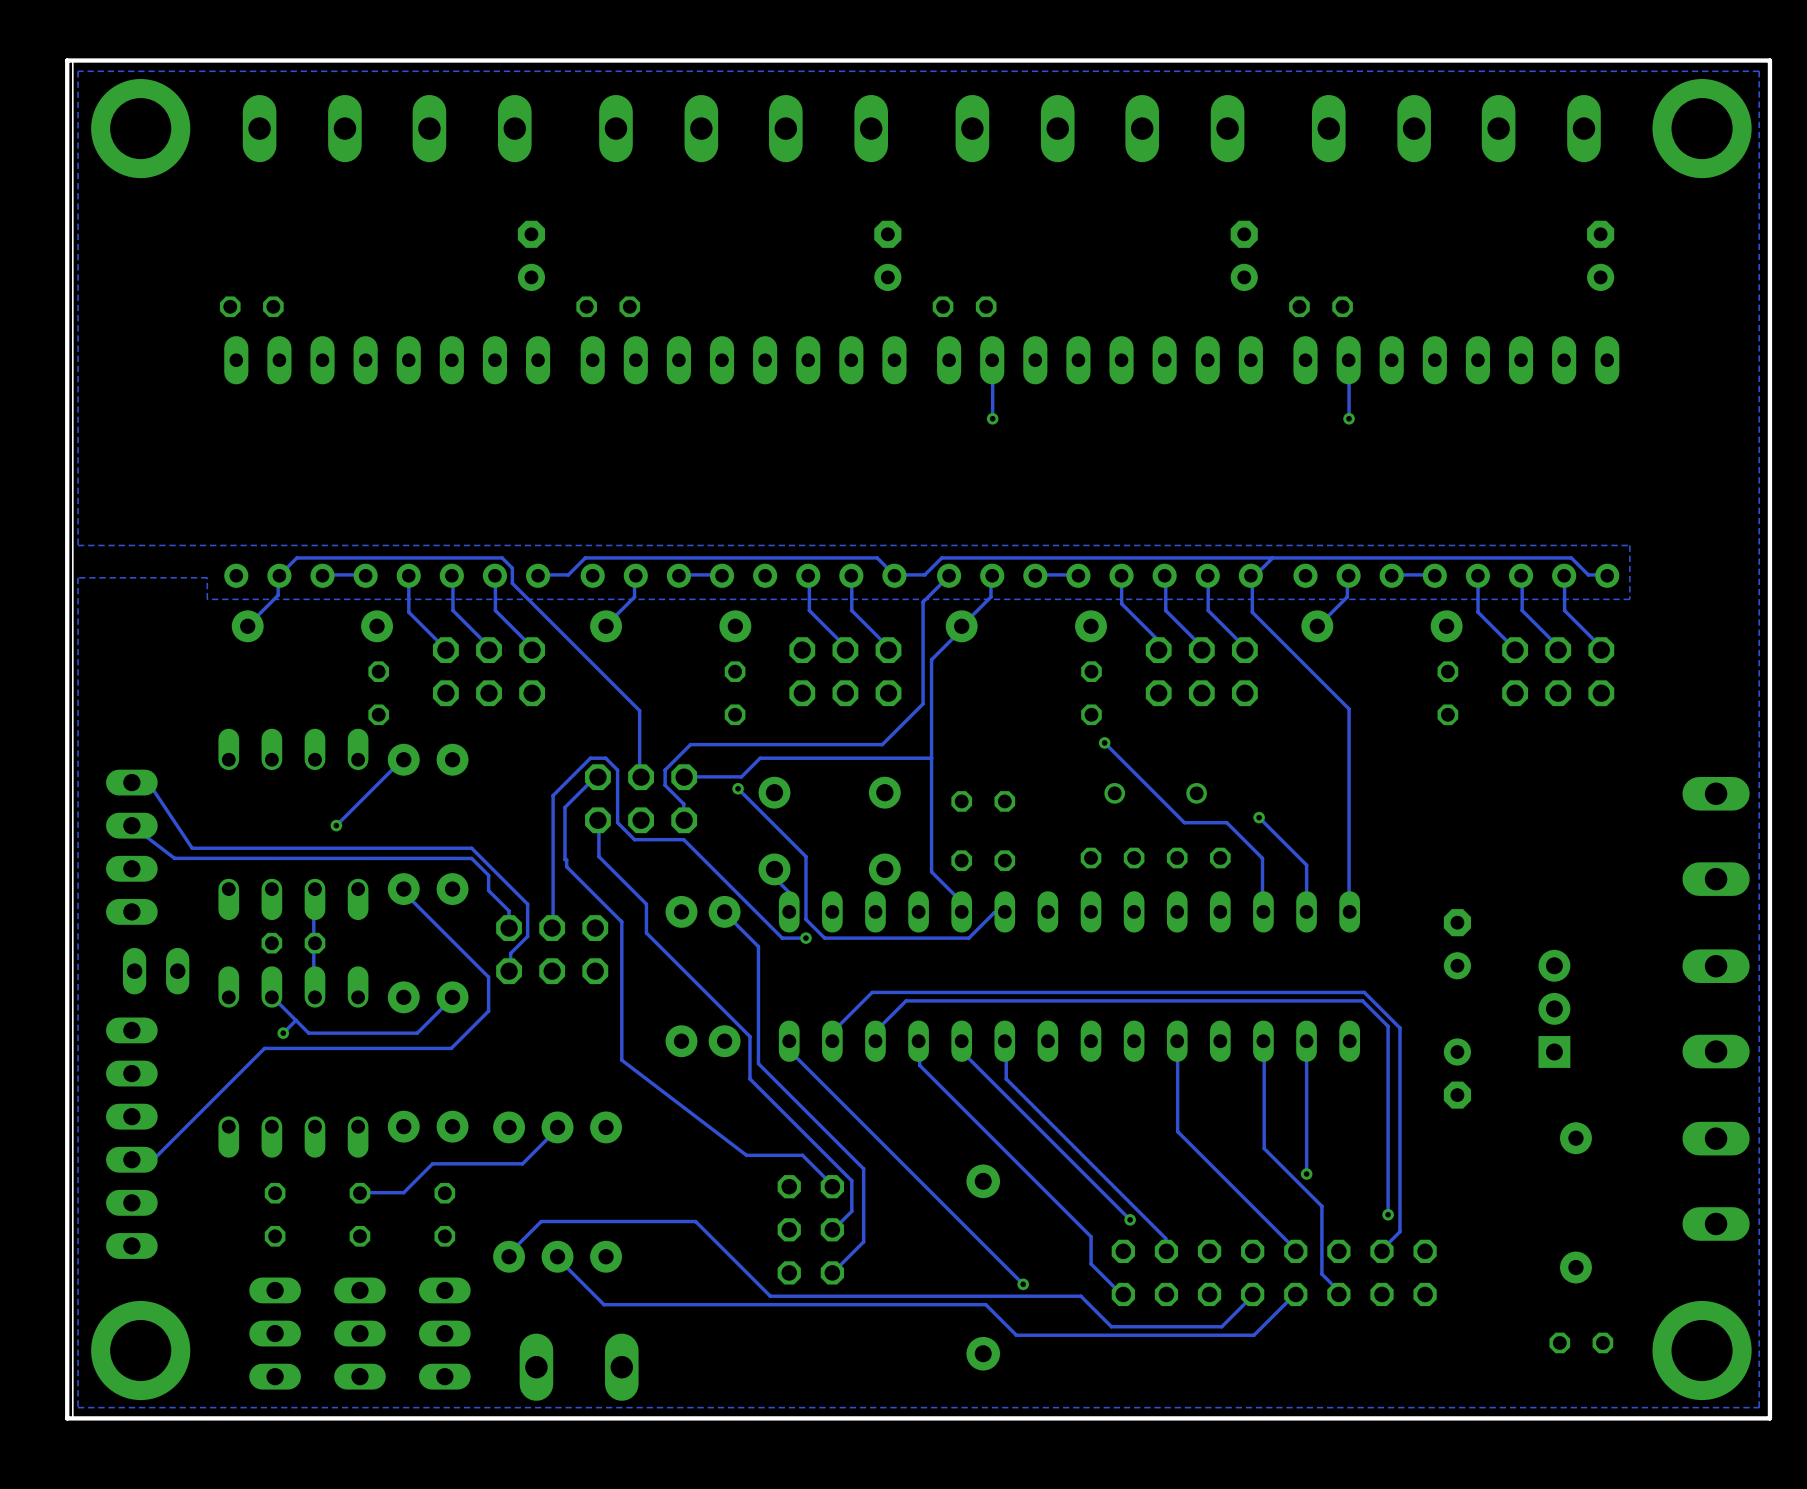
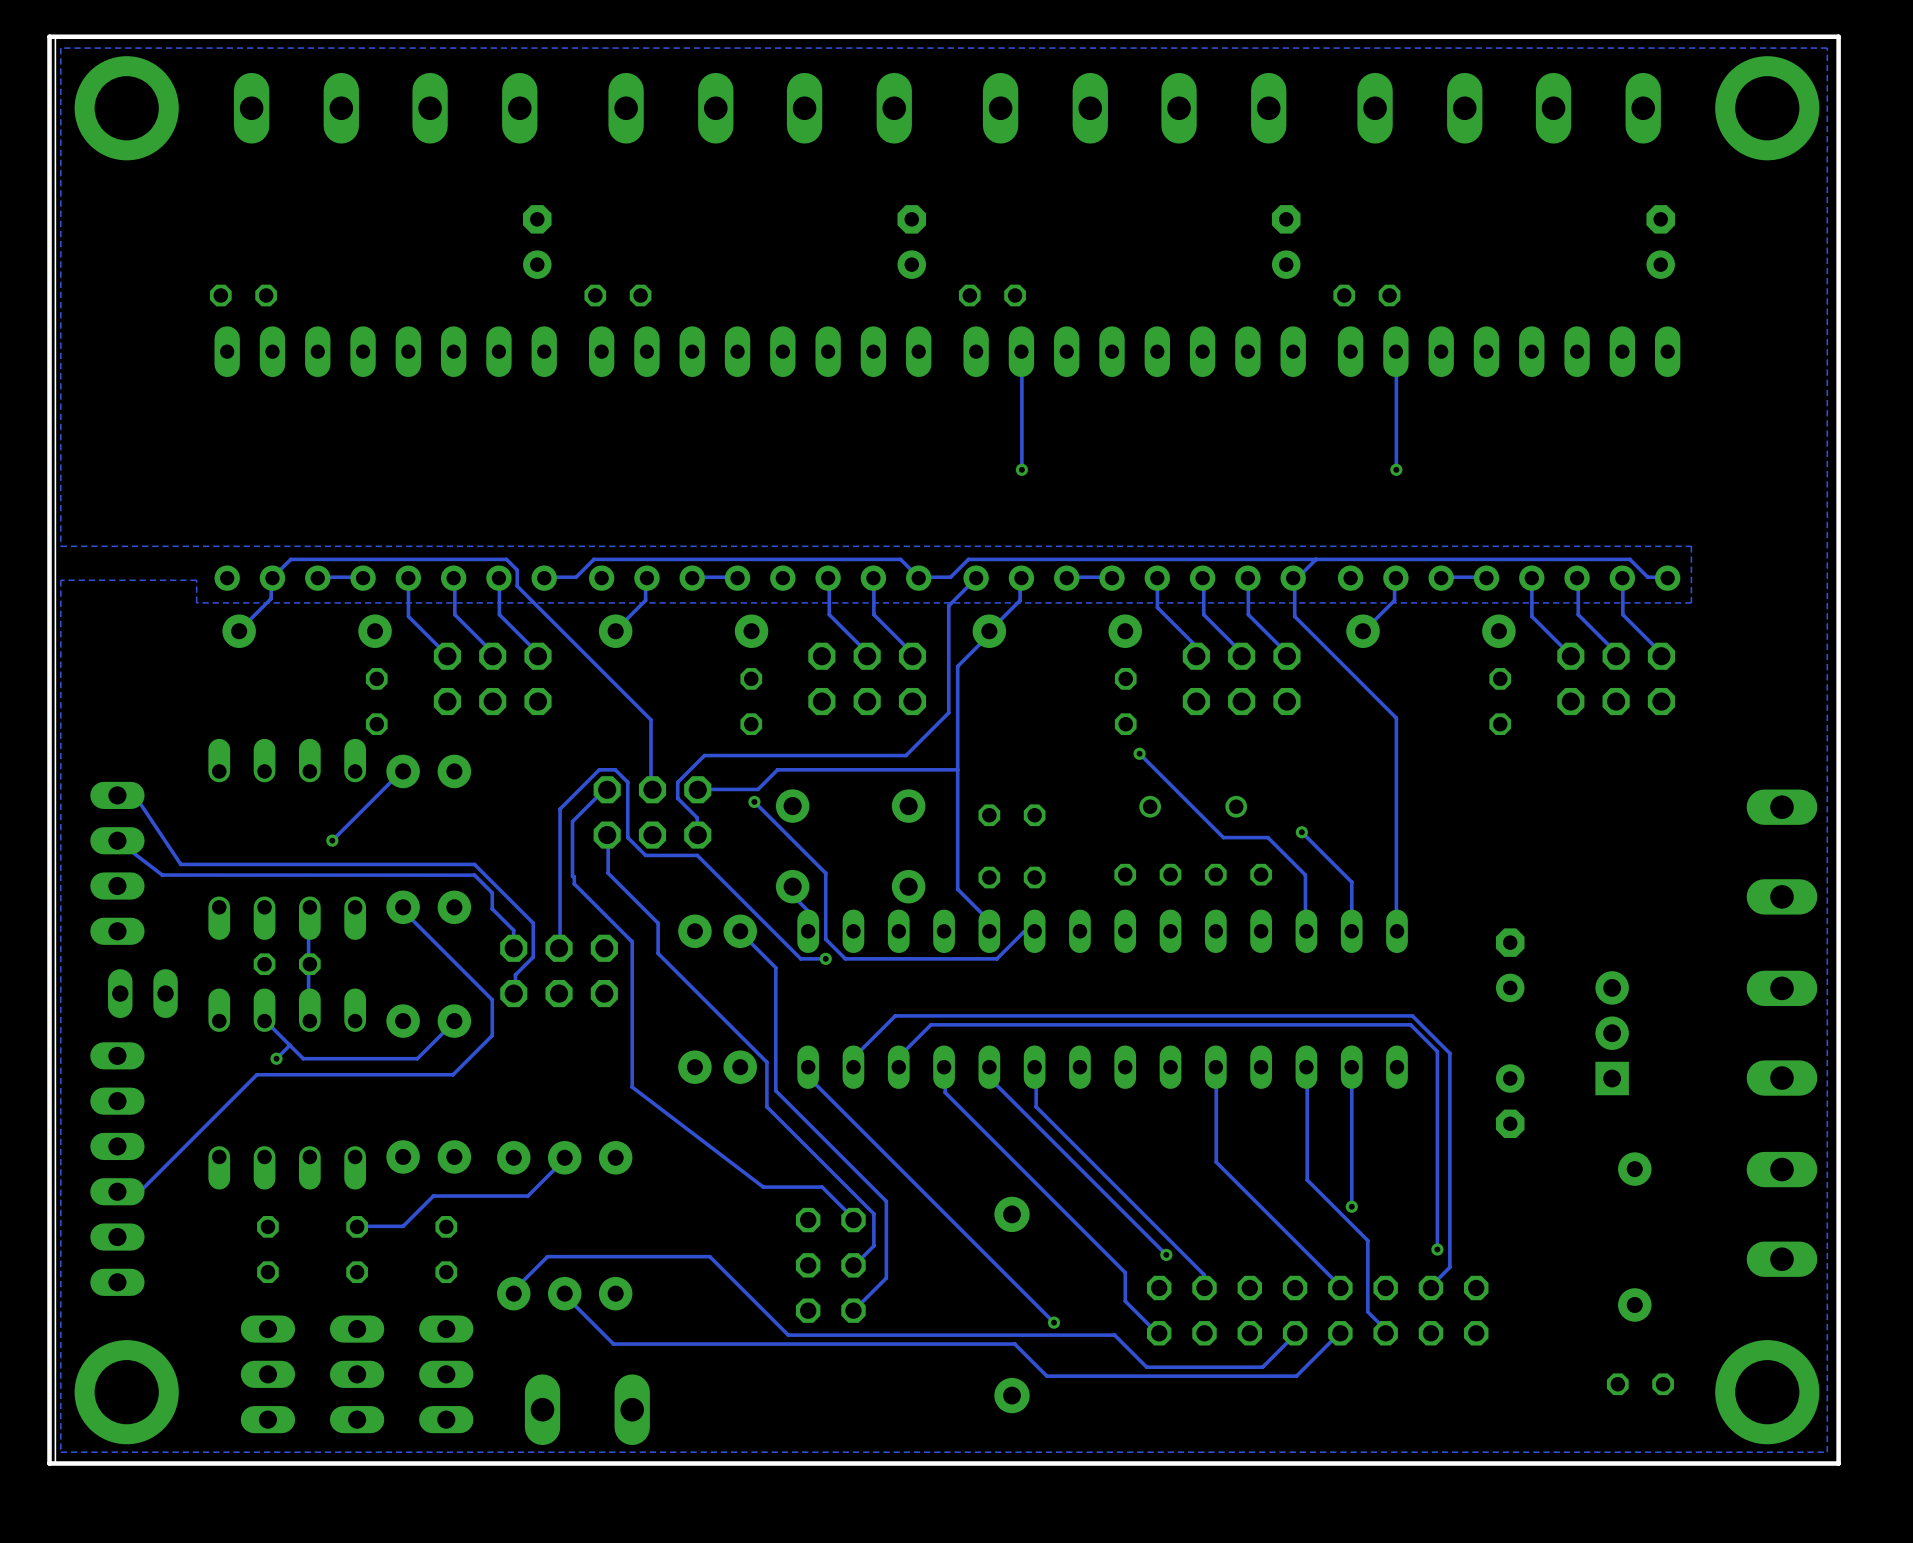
track: none -> (1021, 413) (1021, 469)
via position: (992, 418) -> (1021, 469)
track: none -> (1396, 413) (1396, 469)
via position: (1349, 418) -> (1396, 469)

